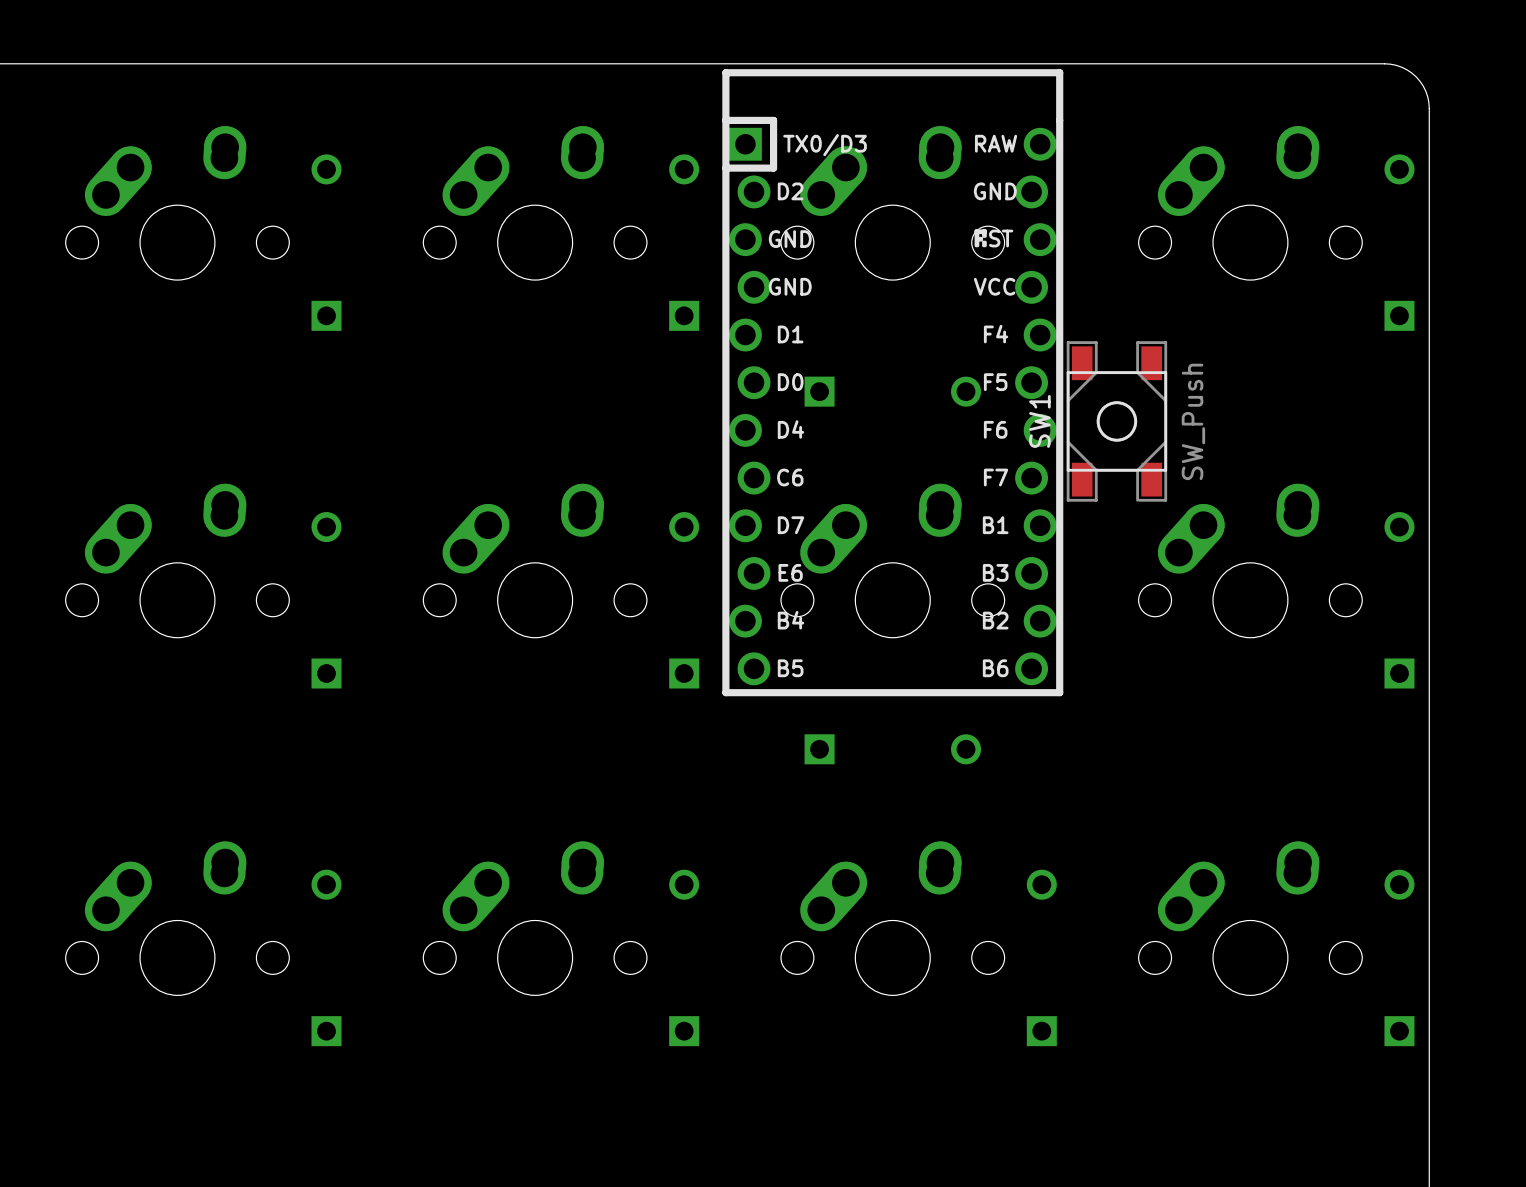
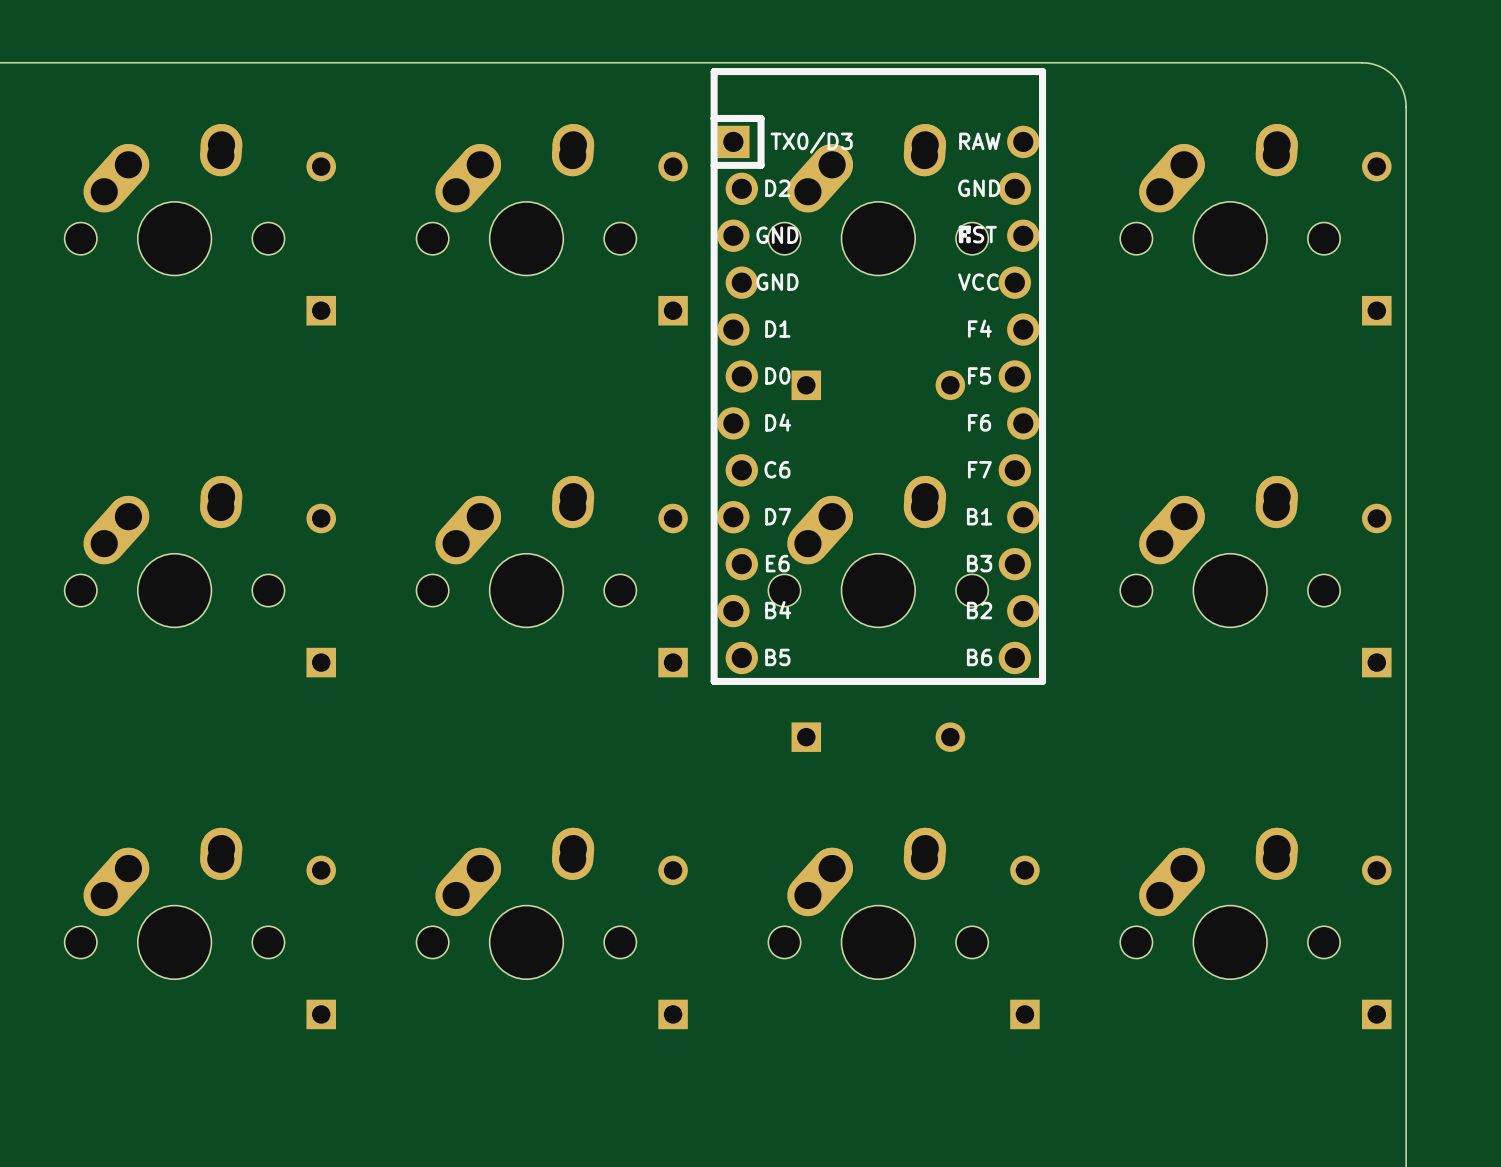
SW1: SW_Push (1116, 421) -> none

